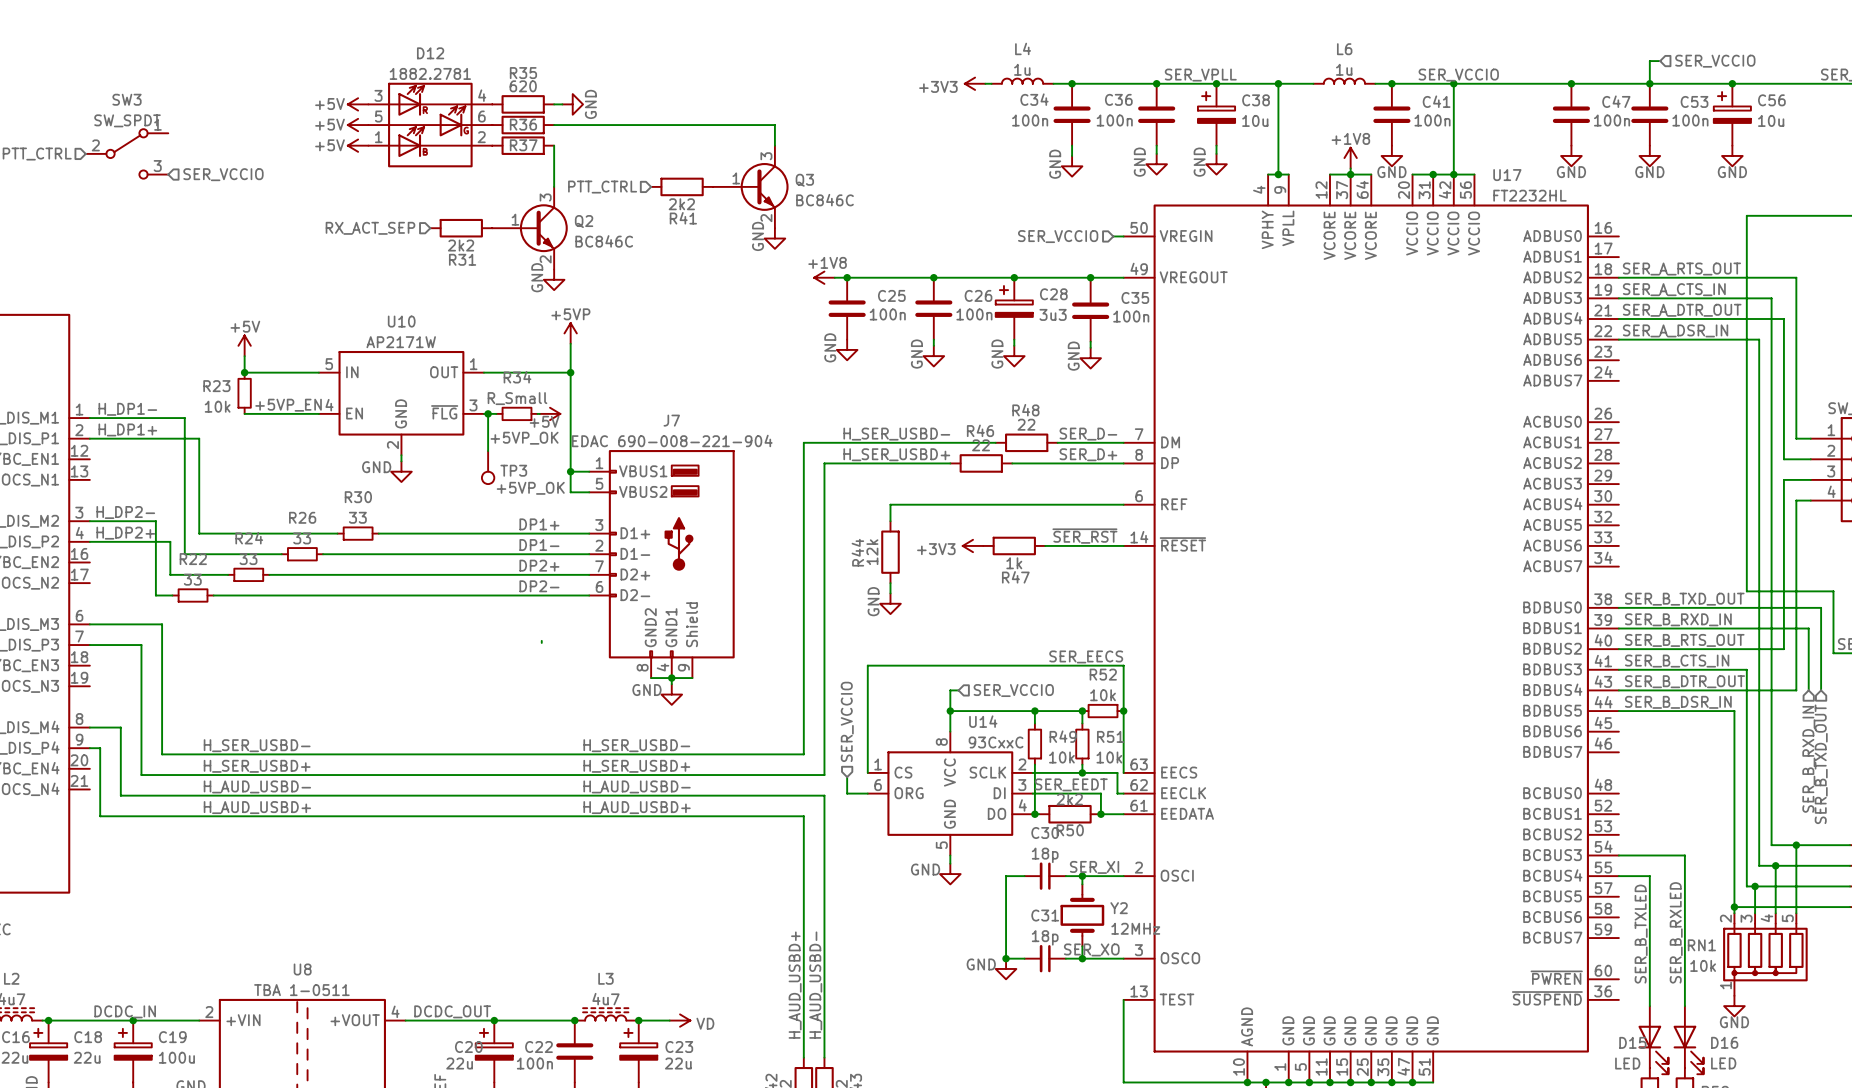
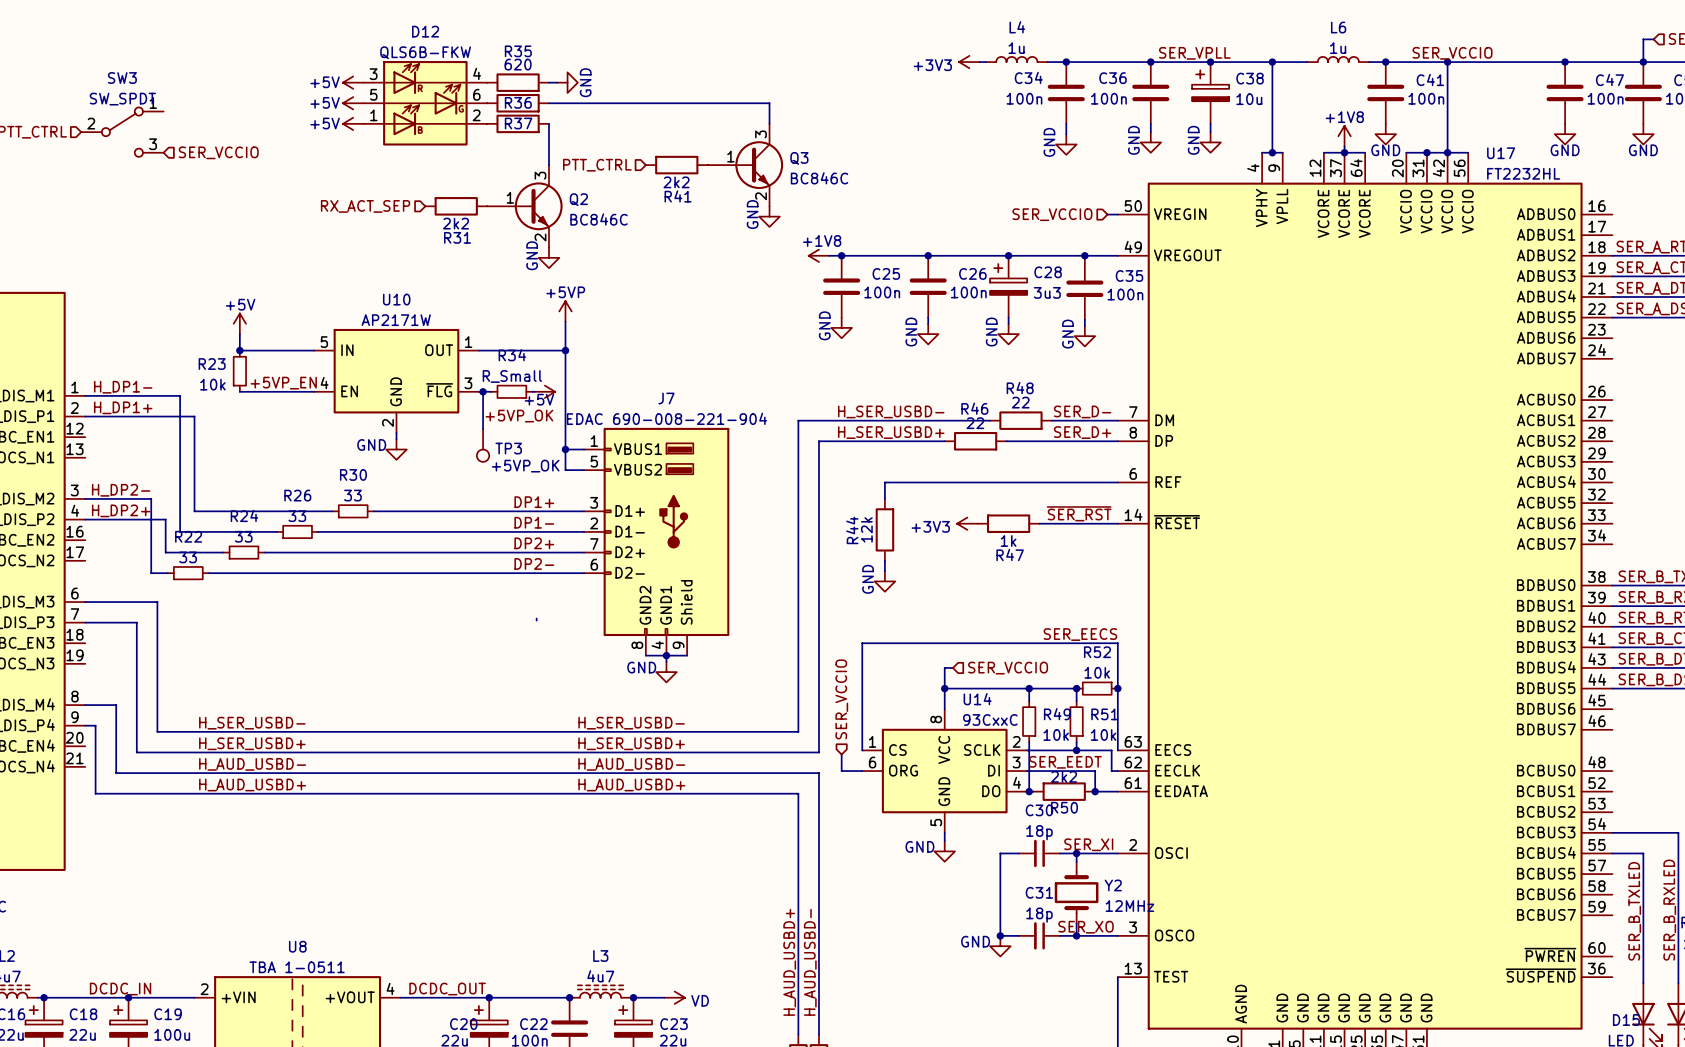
D12 value: 1882.2781 (430, 73) -> QLS6B-FKW (425, 52)

